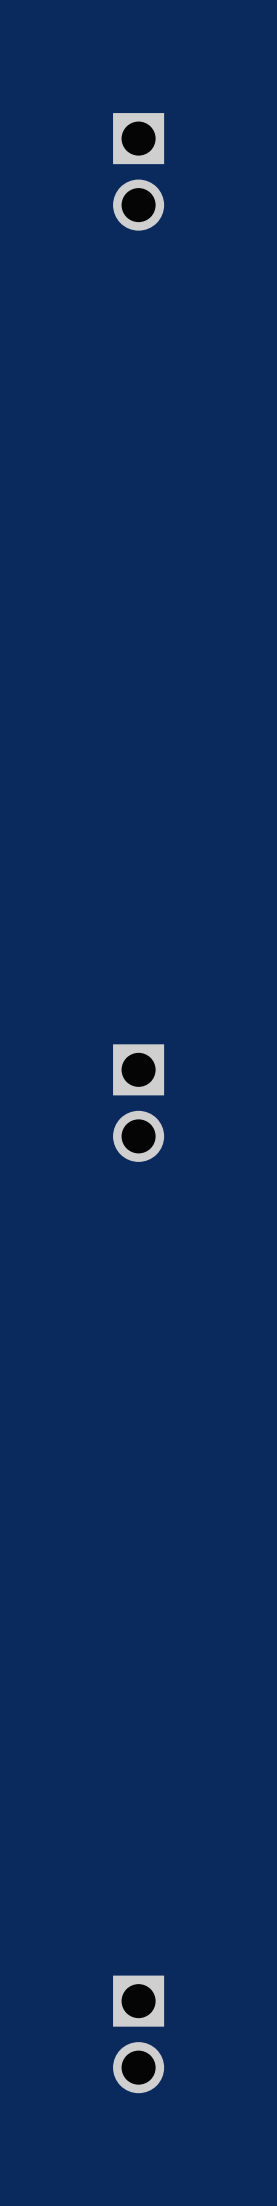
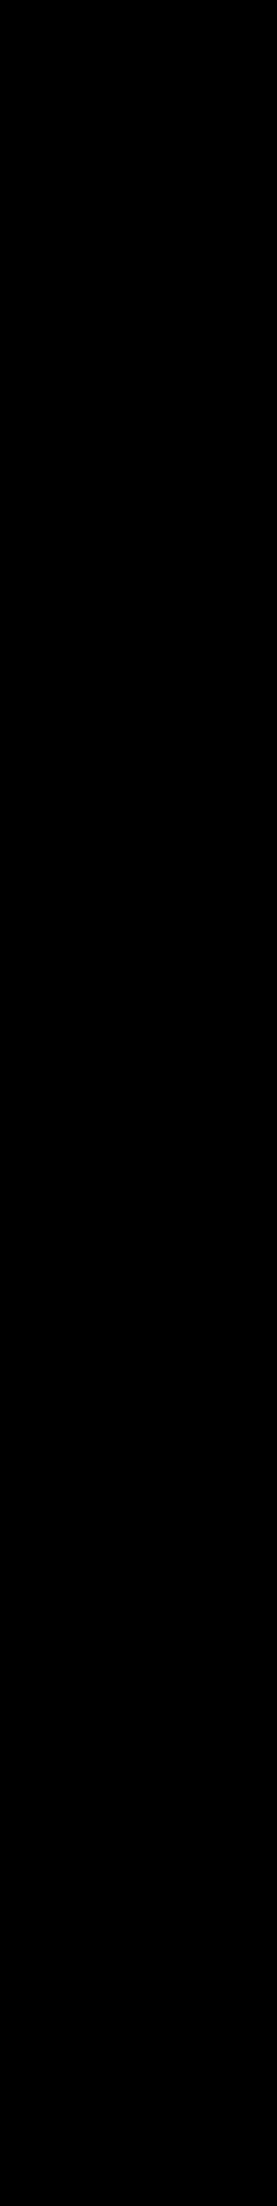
part: (138, 171) -> none
part: (138, 1103) -> none
part: (138, 2034) -> none

